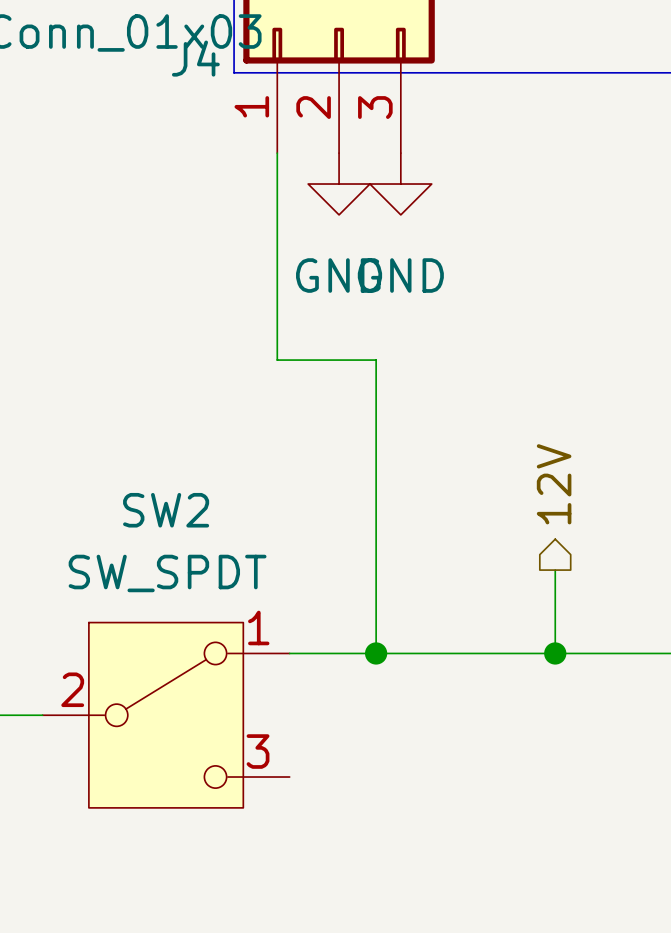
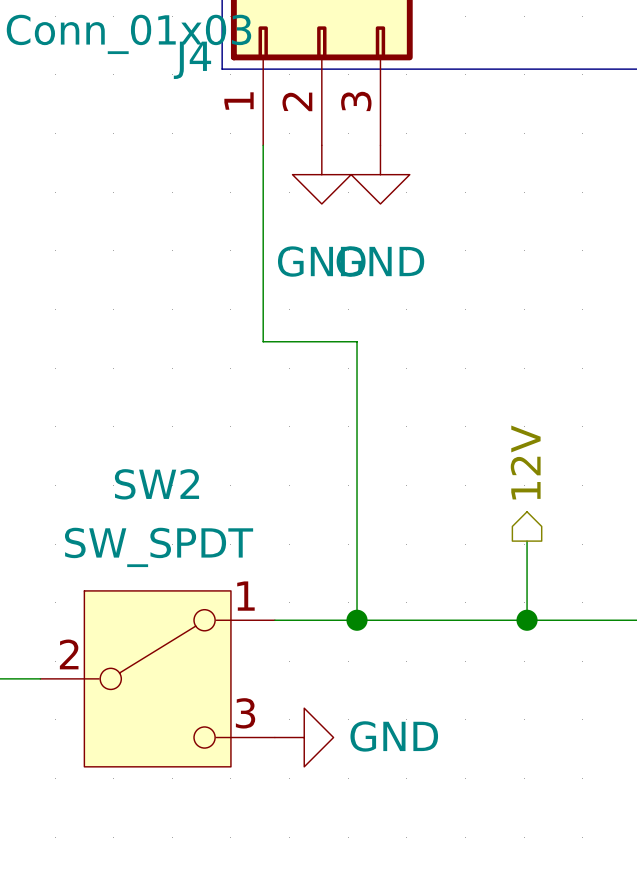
power symbol: none -> GND (304, 737)

